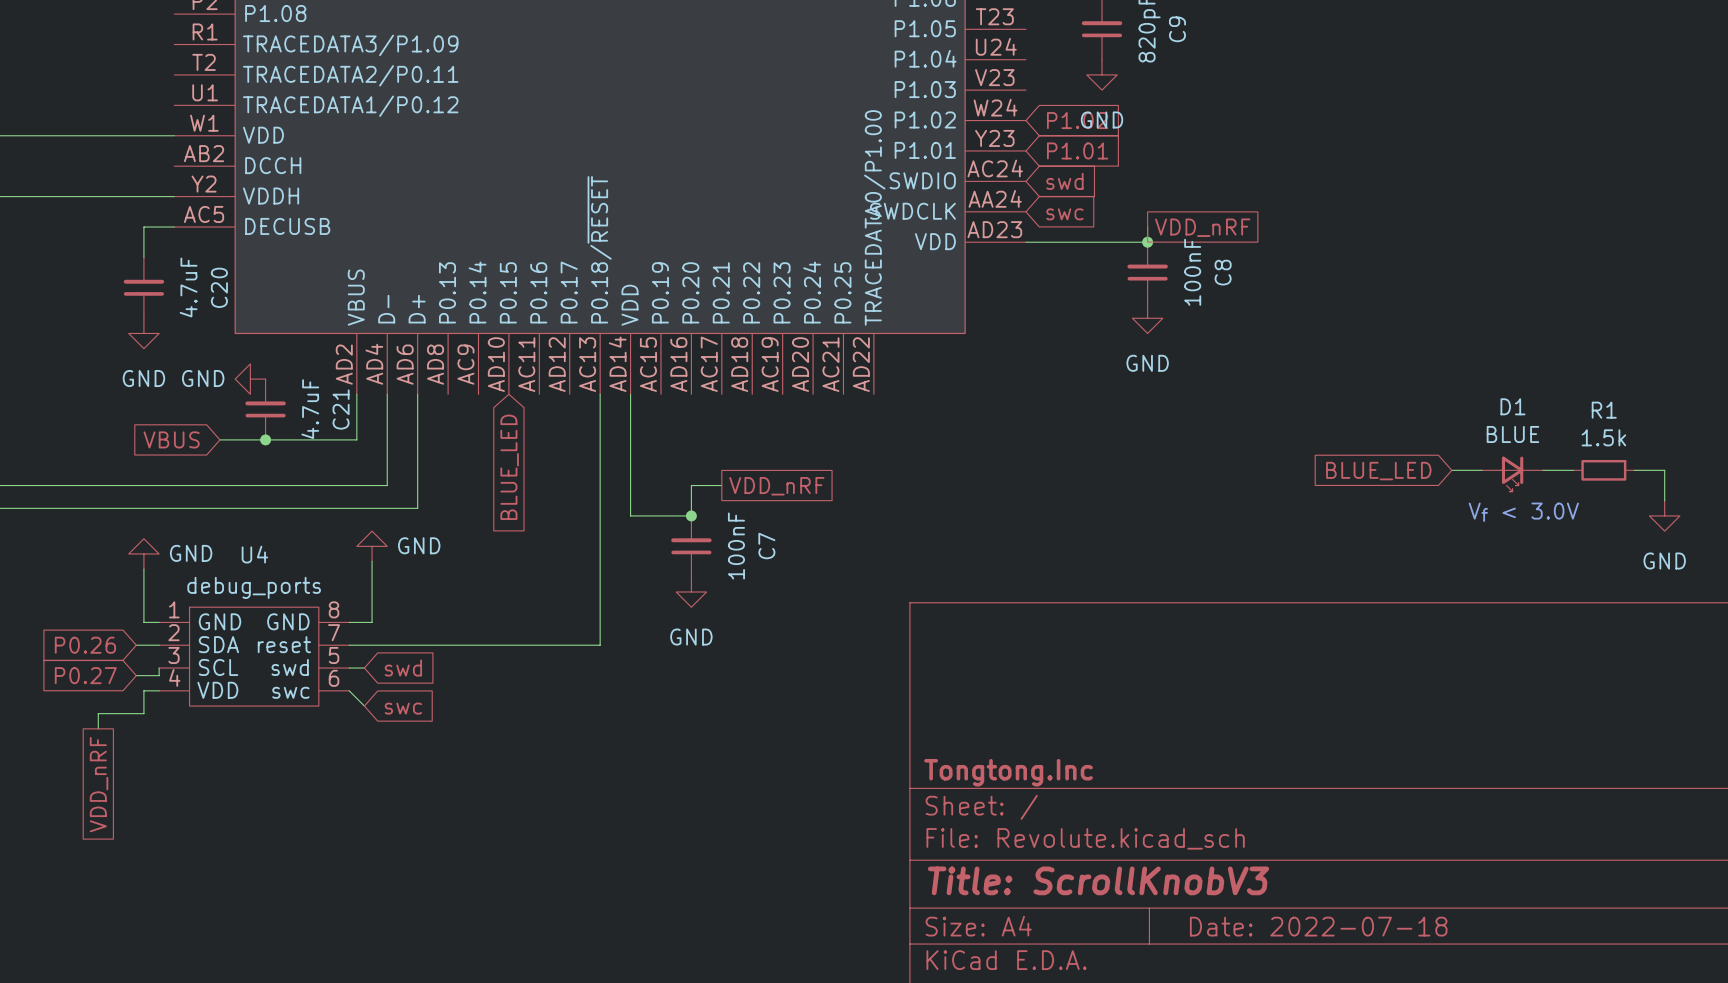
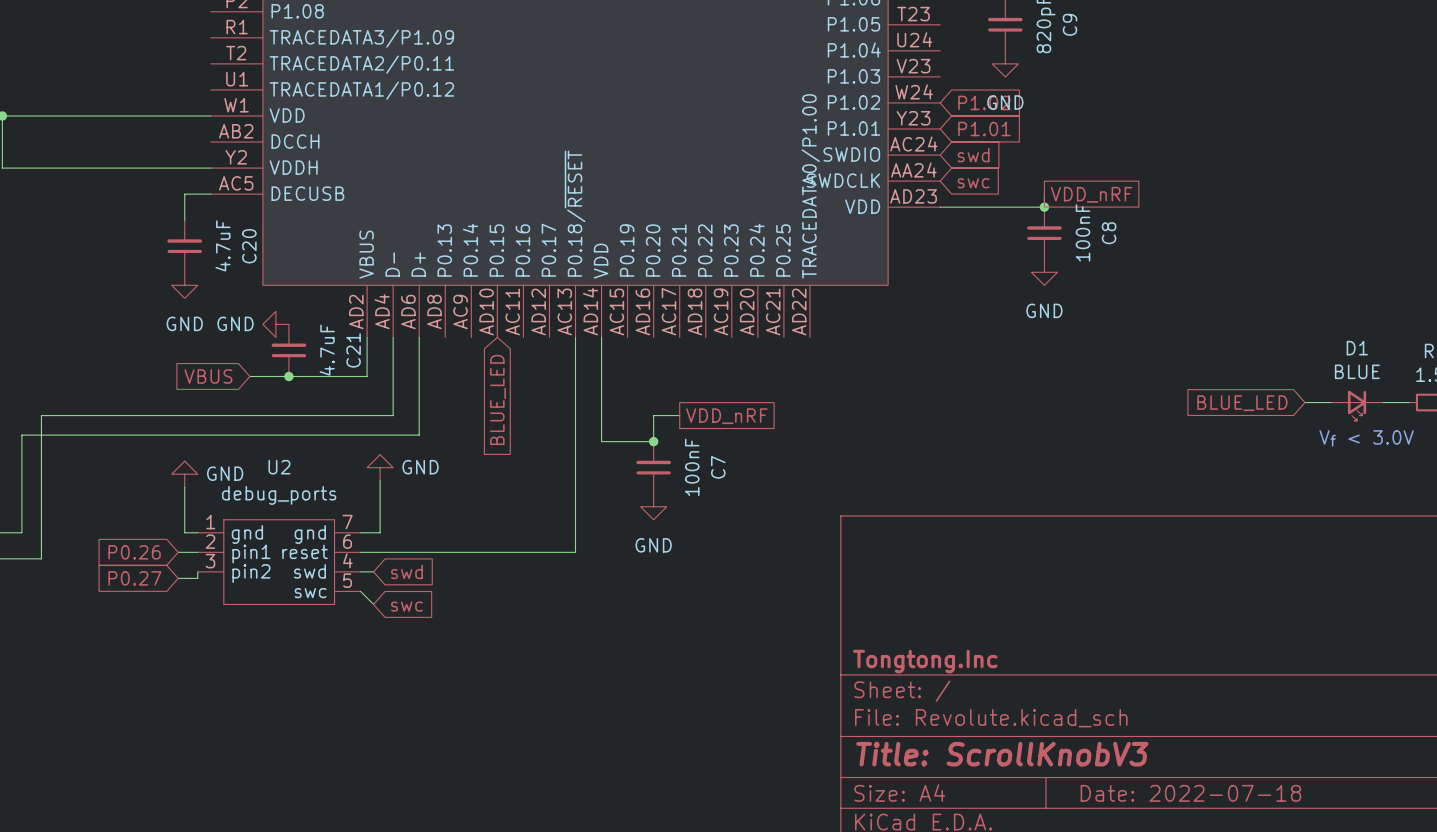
U4: debug_ports (254, 656) -> none
U2: none -> debug_ports (279, 562)
wire: (159, 690) (143, 690) (143, 713) (98, 713) (98, 728) -> none
global label: VDD_nRF (99, 784) -> none

